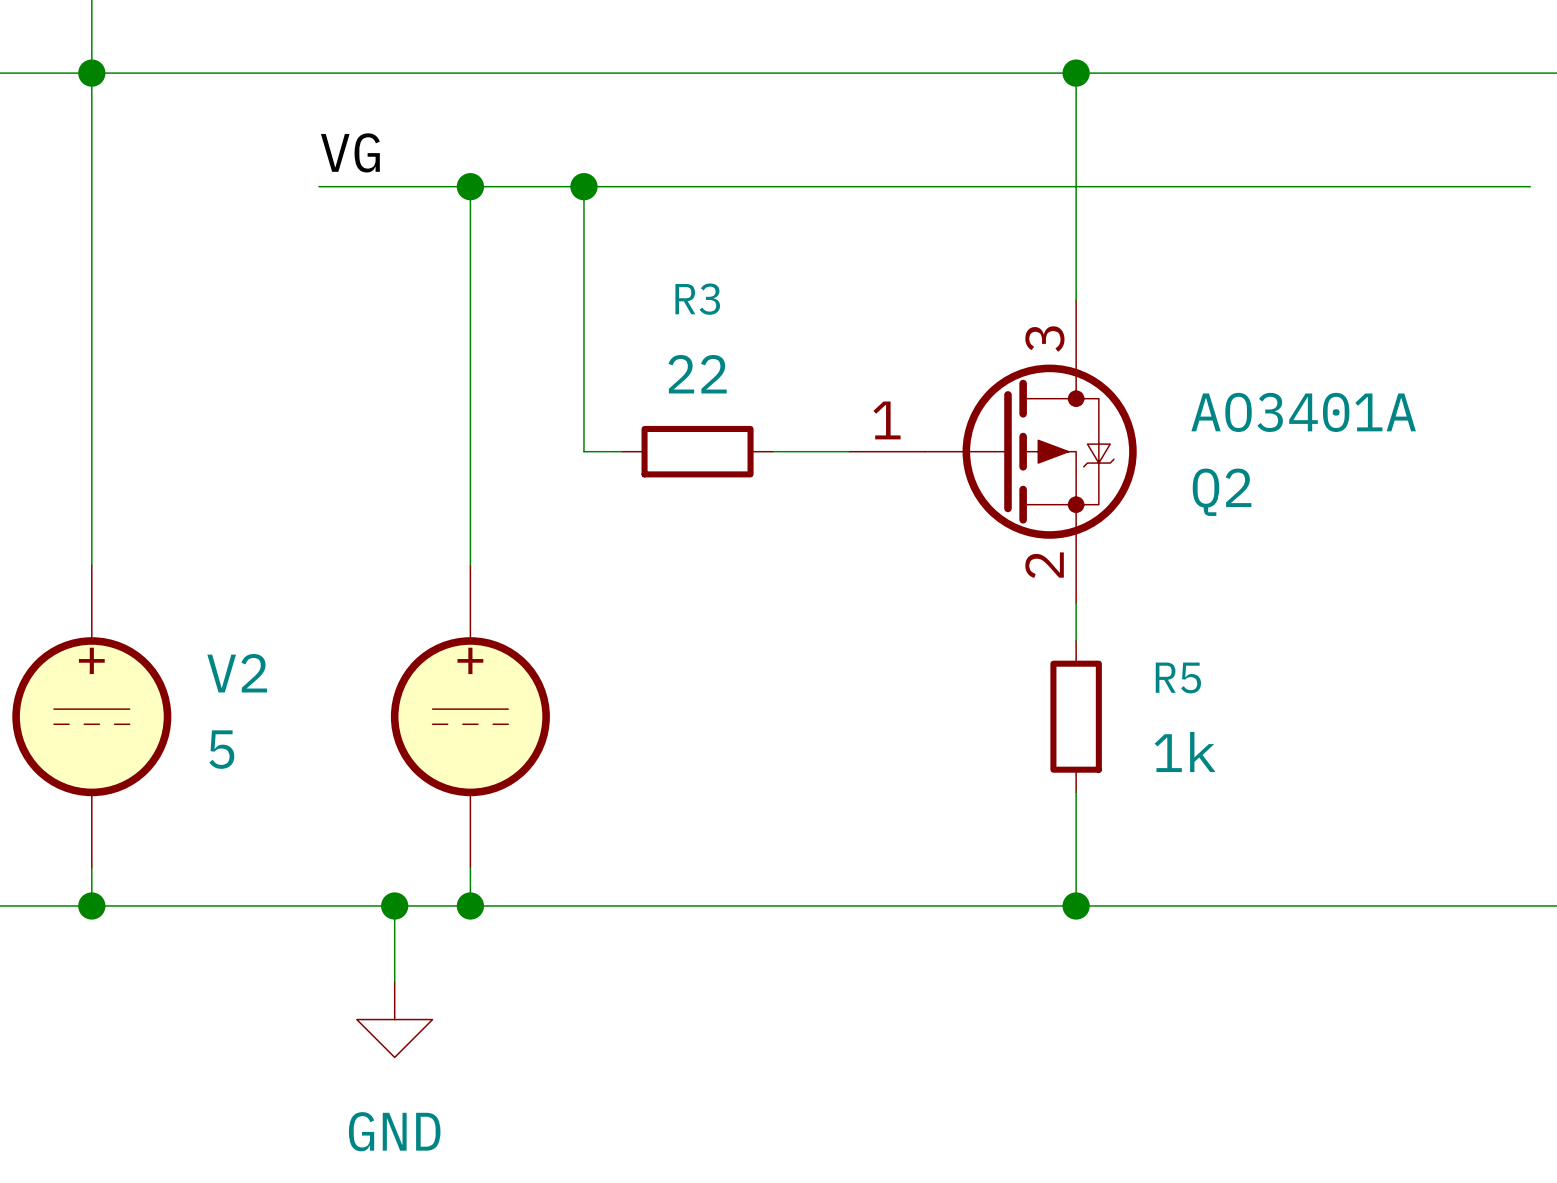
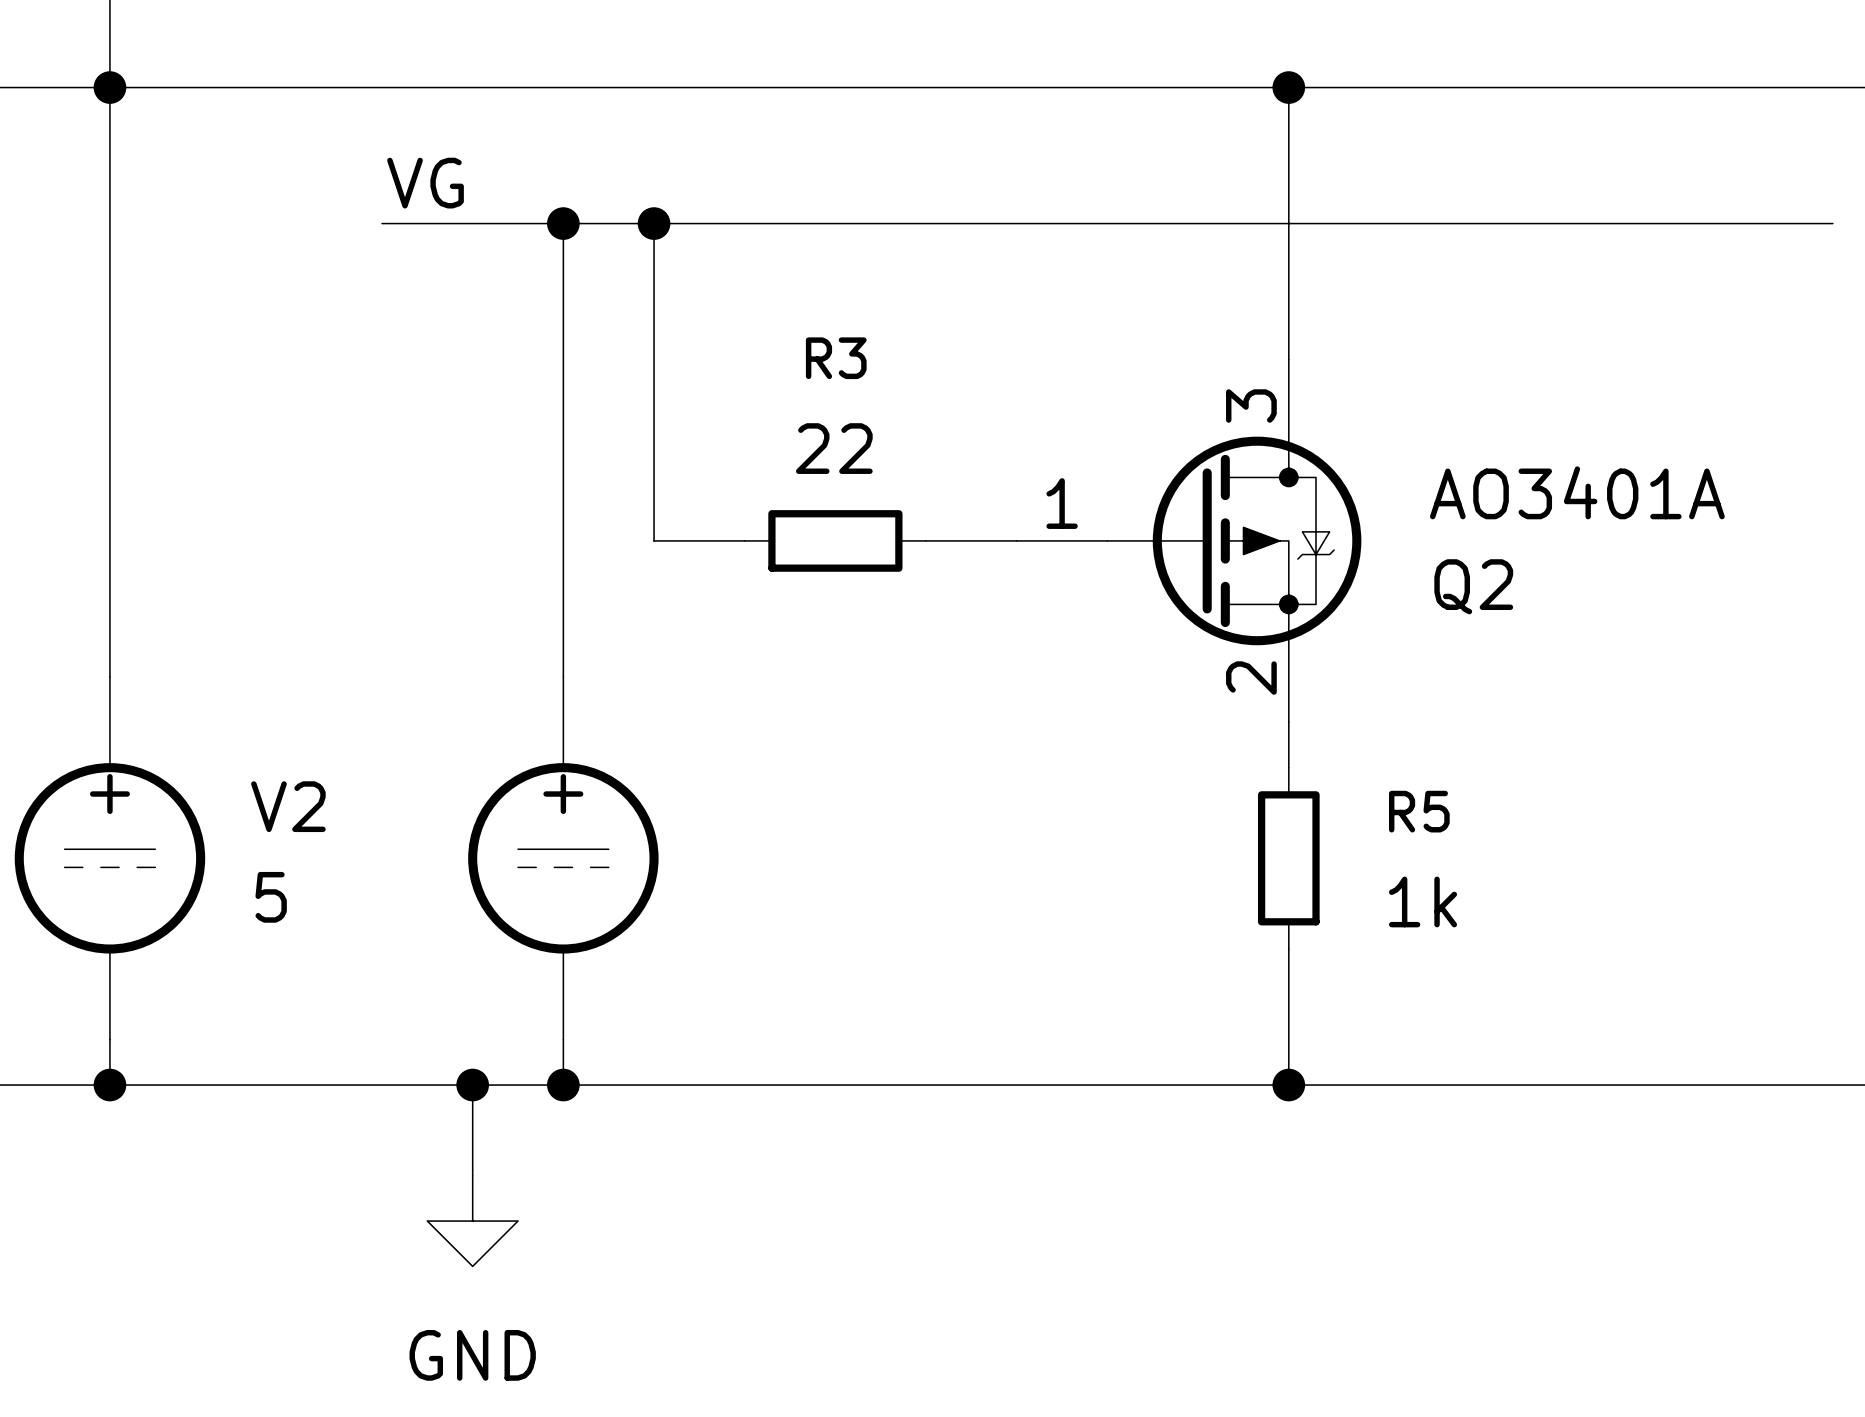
wire: (583, 186) (583, 451) -> (654, 223) (654, 540) (699, 540)
junction position: (583, 186) -> (654, 223)

